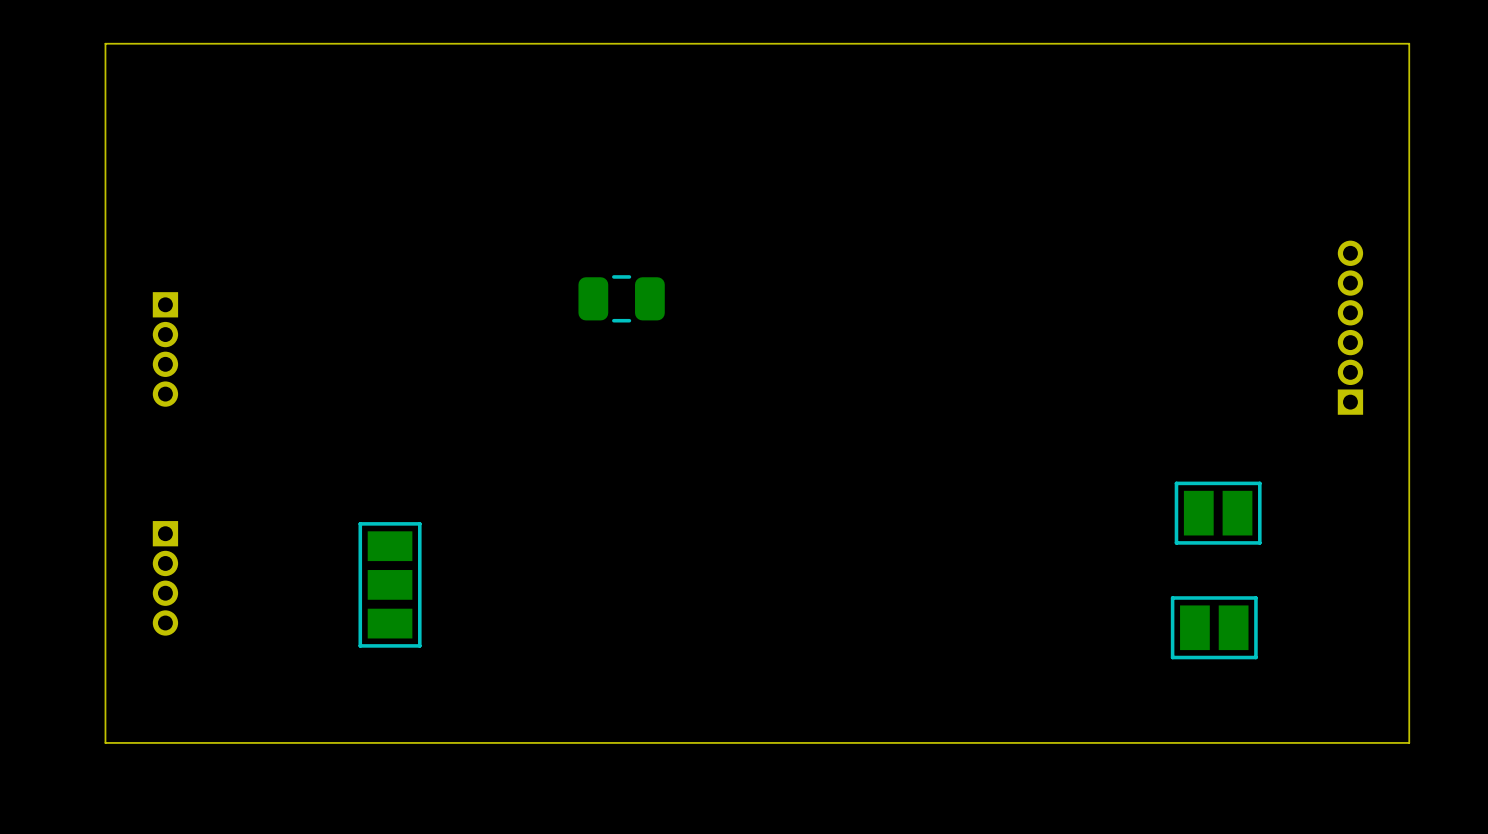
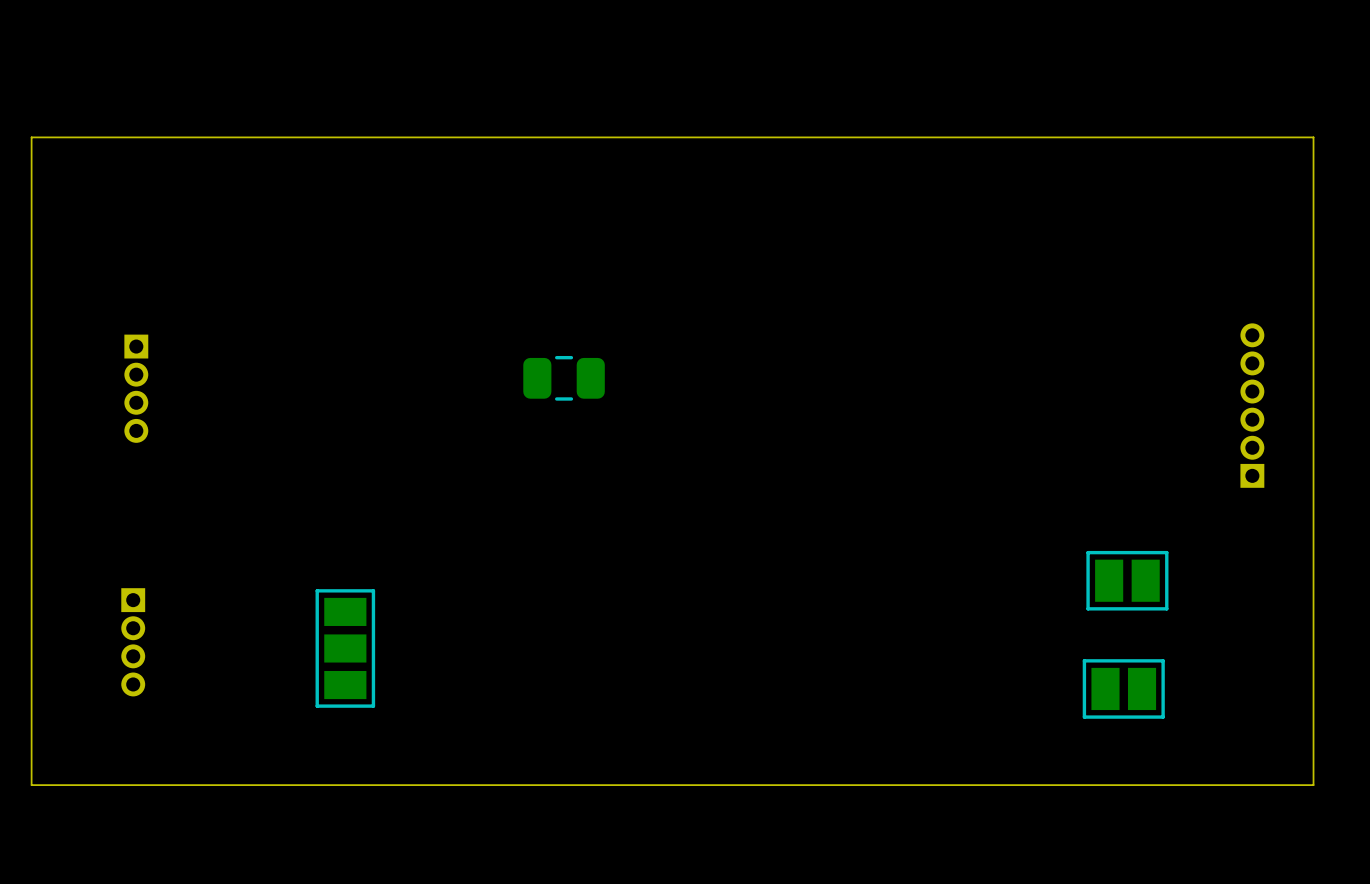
board edge: (1409, 43) (1409, 742) (105, 742) (105, 43) -> (1307, 137) (1313, 137) (1313, 785) (31, 785) (31, 137) (76, 137)
part position: (165, 349) -> (136, 388)

